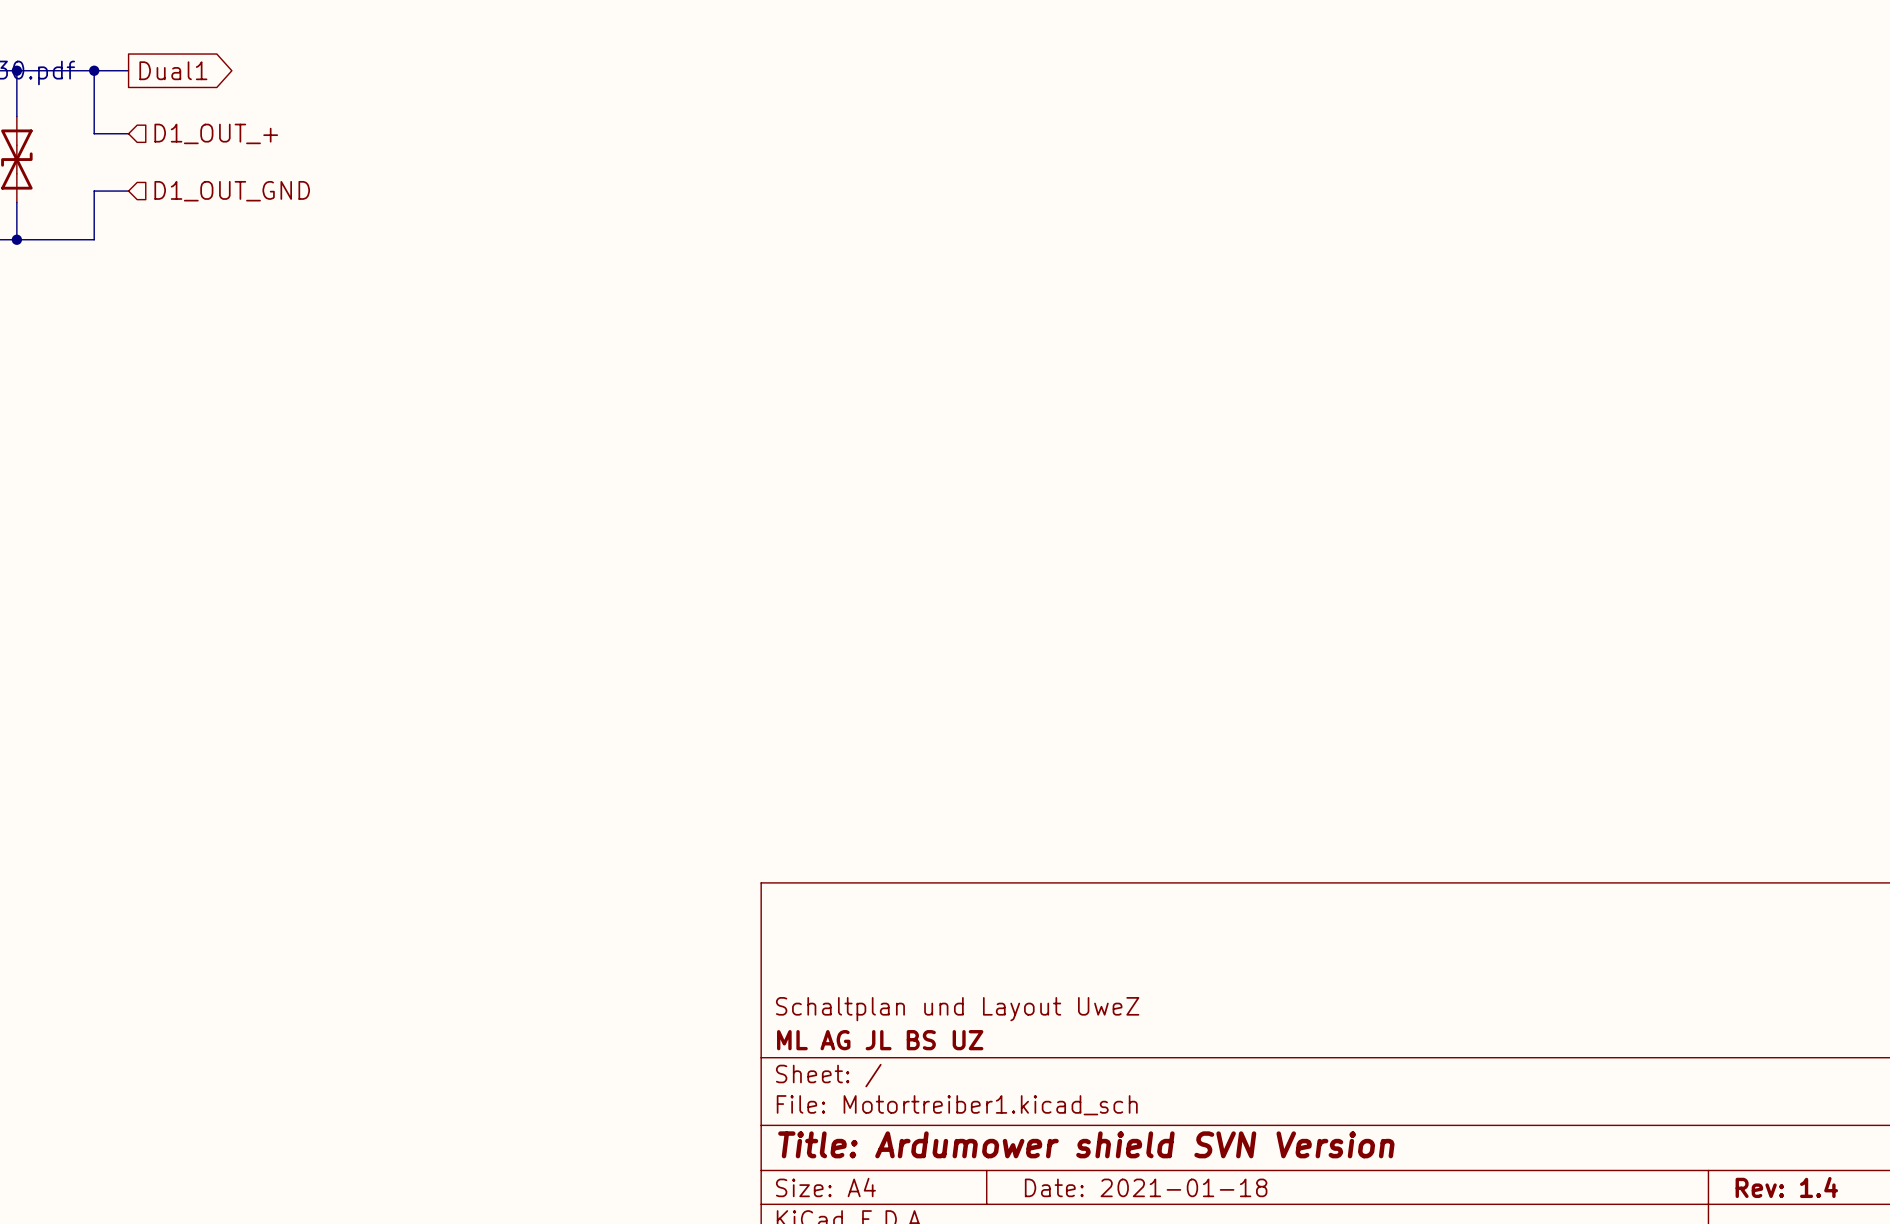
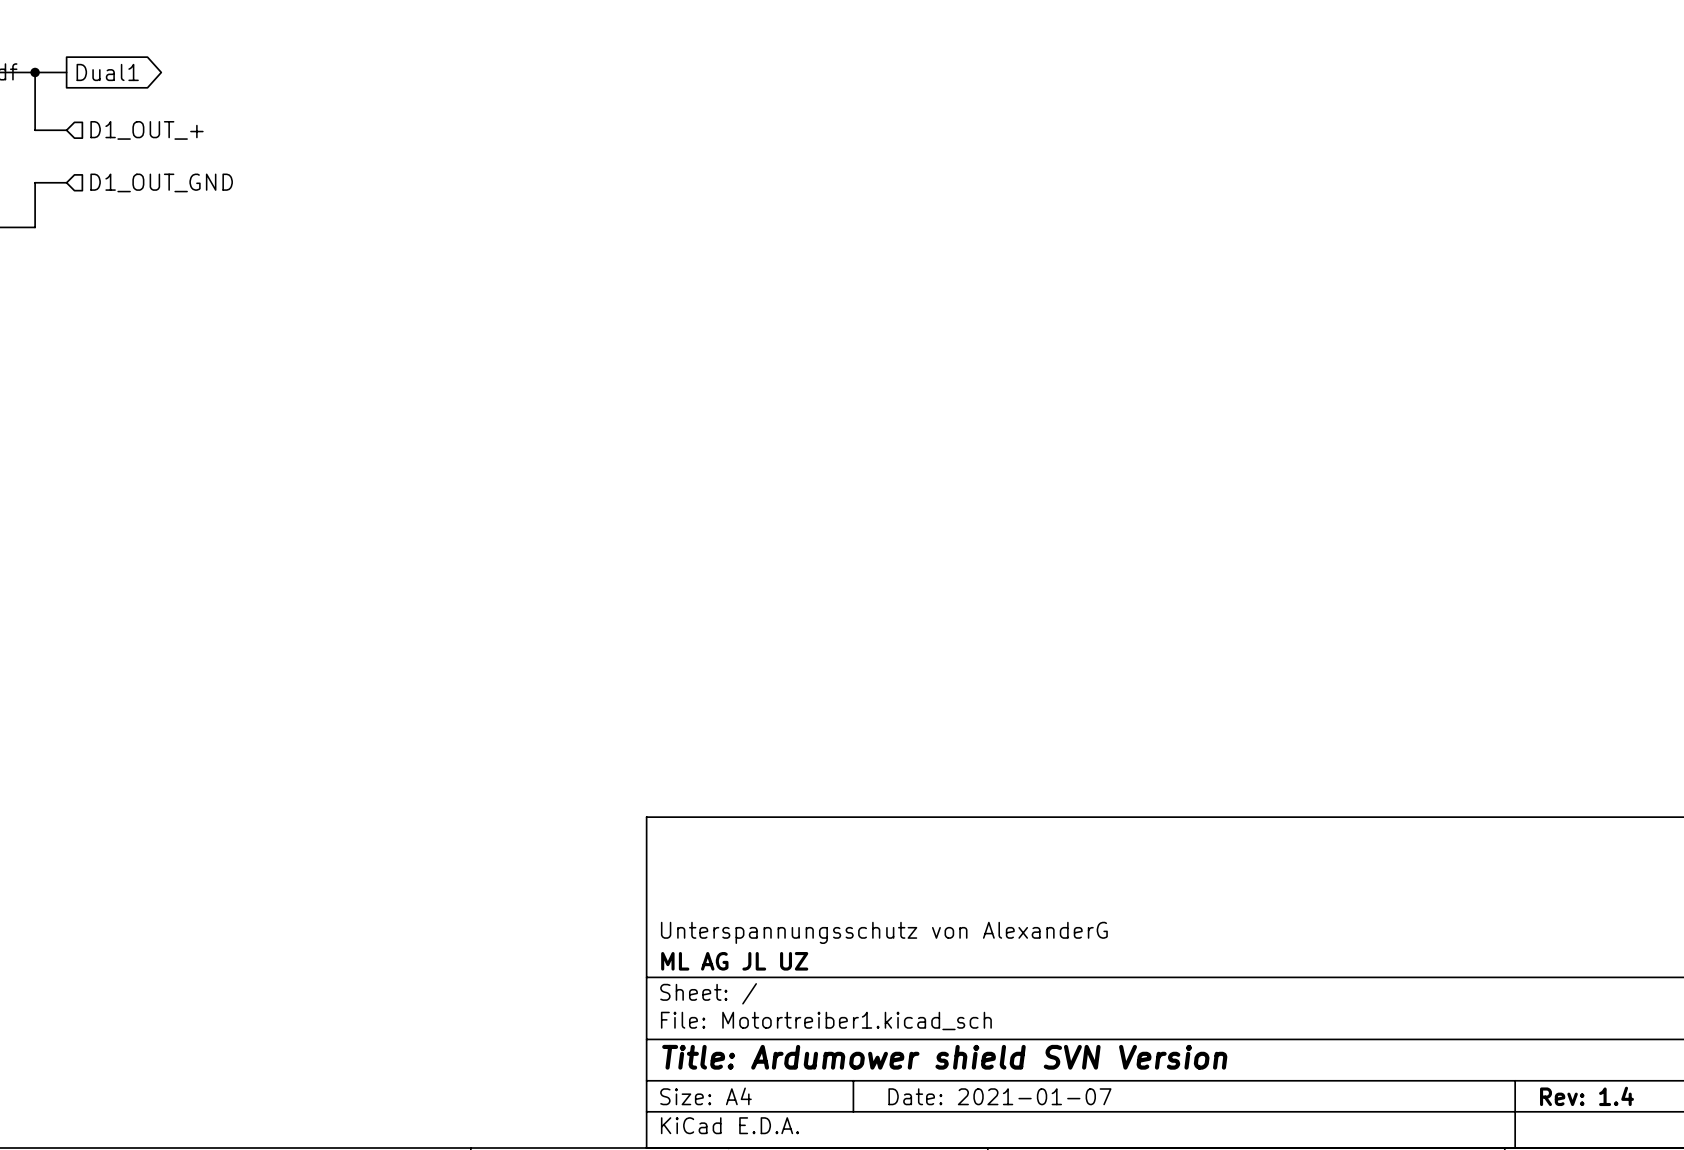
title block: Schaltplan und Layout UweZ (957, 1009) -> Unterspannungsschutz von AlexanderG (884, 932)
title block: ML AG JL BS UZ (880, 1040) -> ML AG JL UZ (734, 961)
title block: Date: 2021-01-18 (1146, 1187) -> Date: 2021-01-07 (999, 1096)

